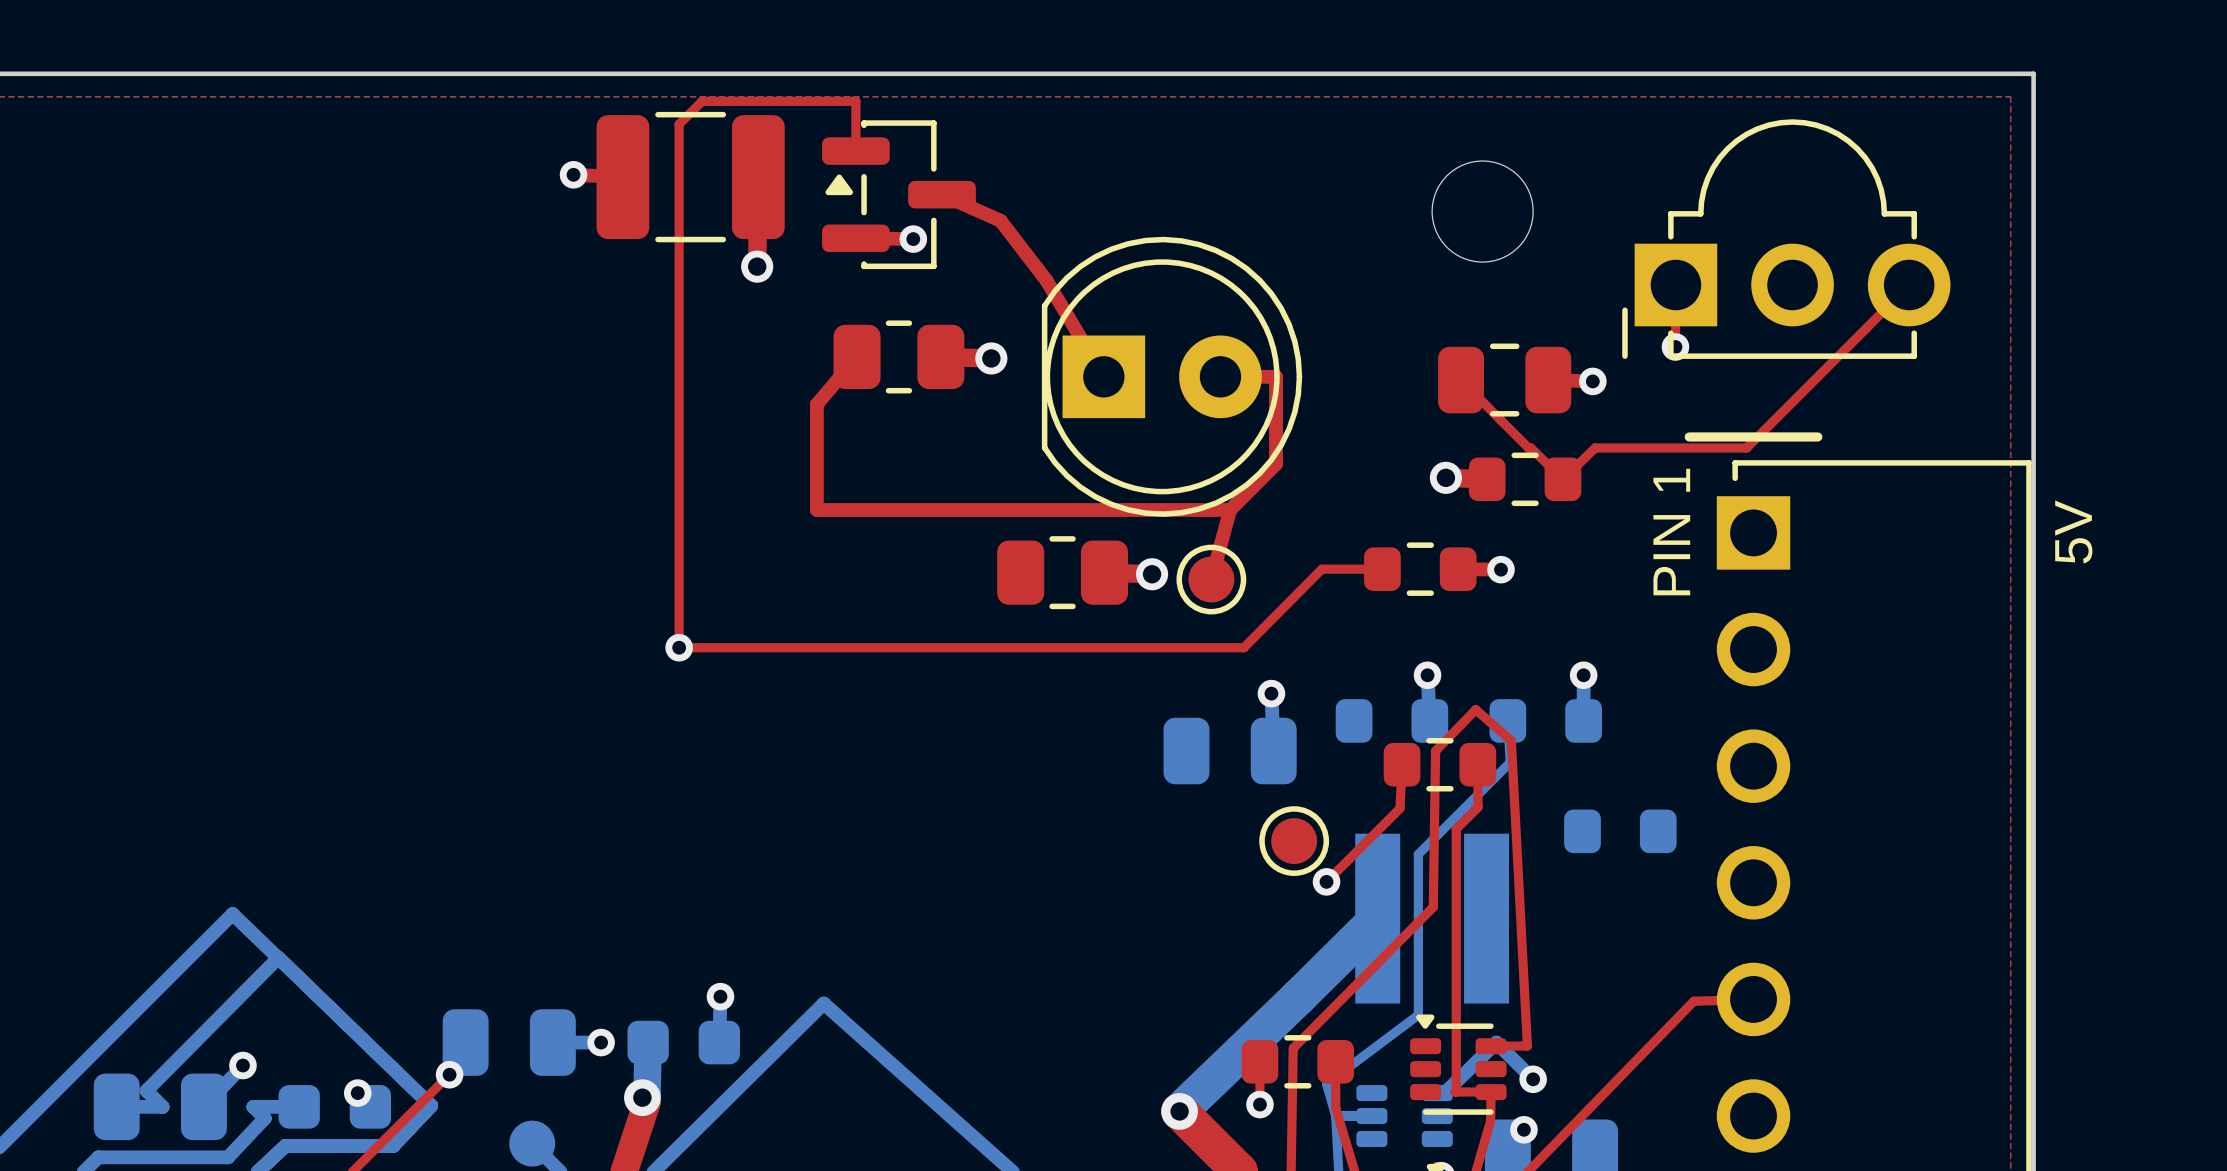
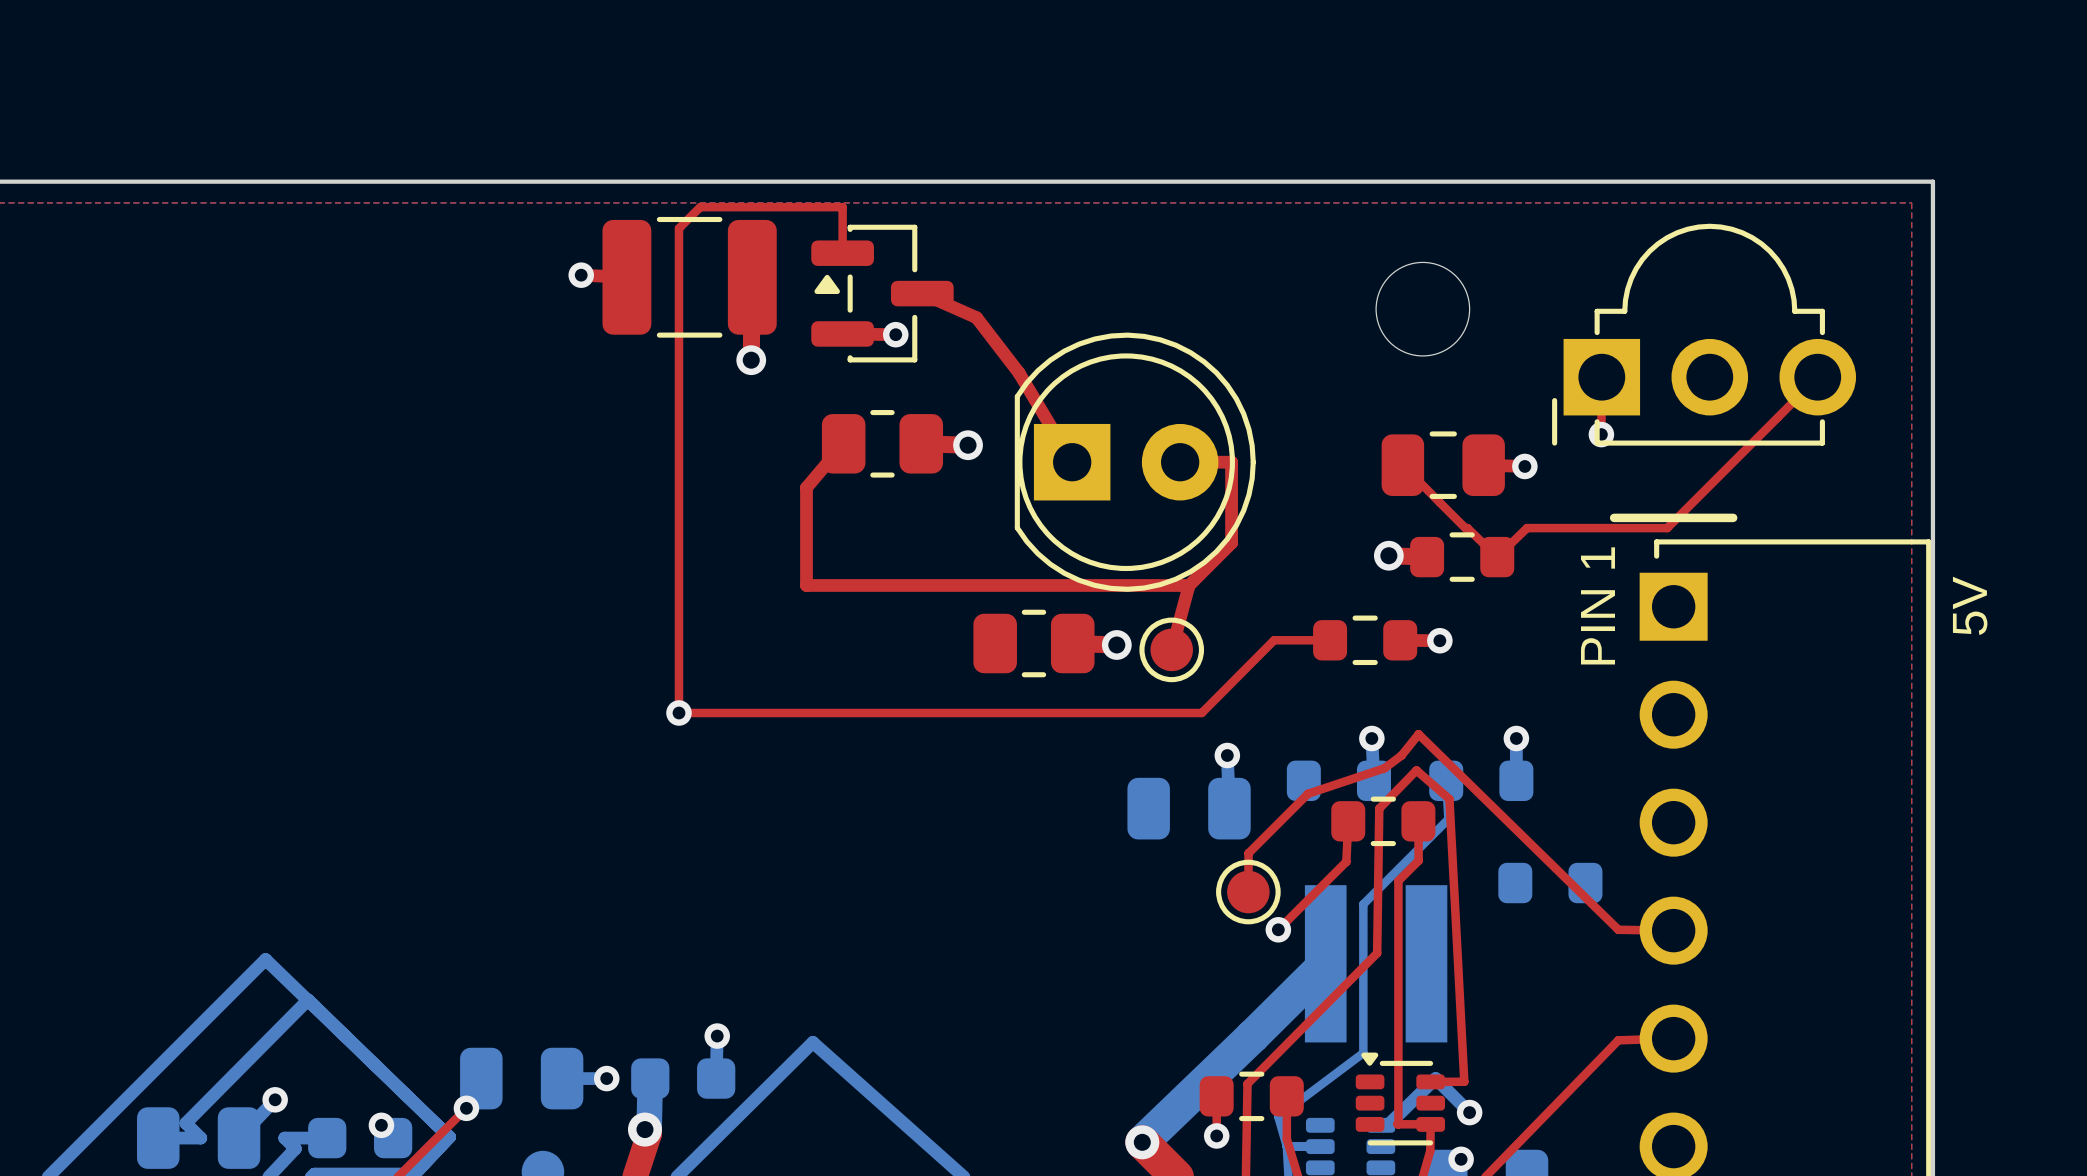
top track: none -> (1248, 892) (1248, 853) (1308, 793) (1384, 768) (1401, 755) (1418, 734) (1618, 929) (1673, 930)

